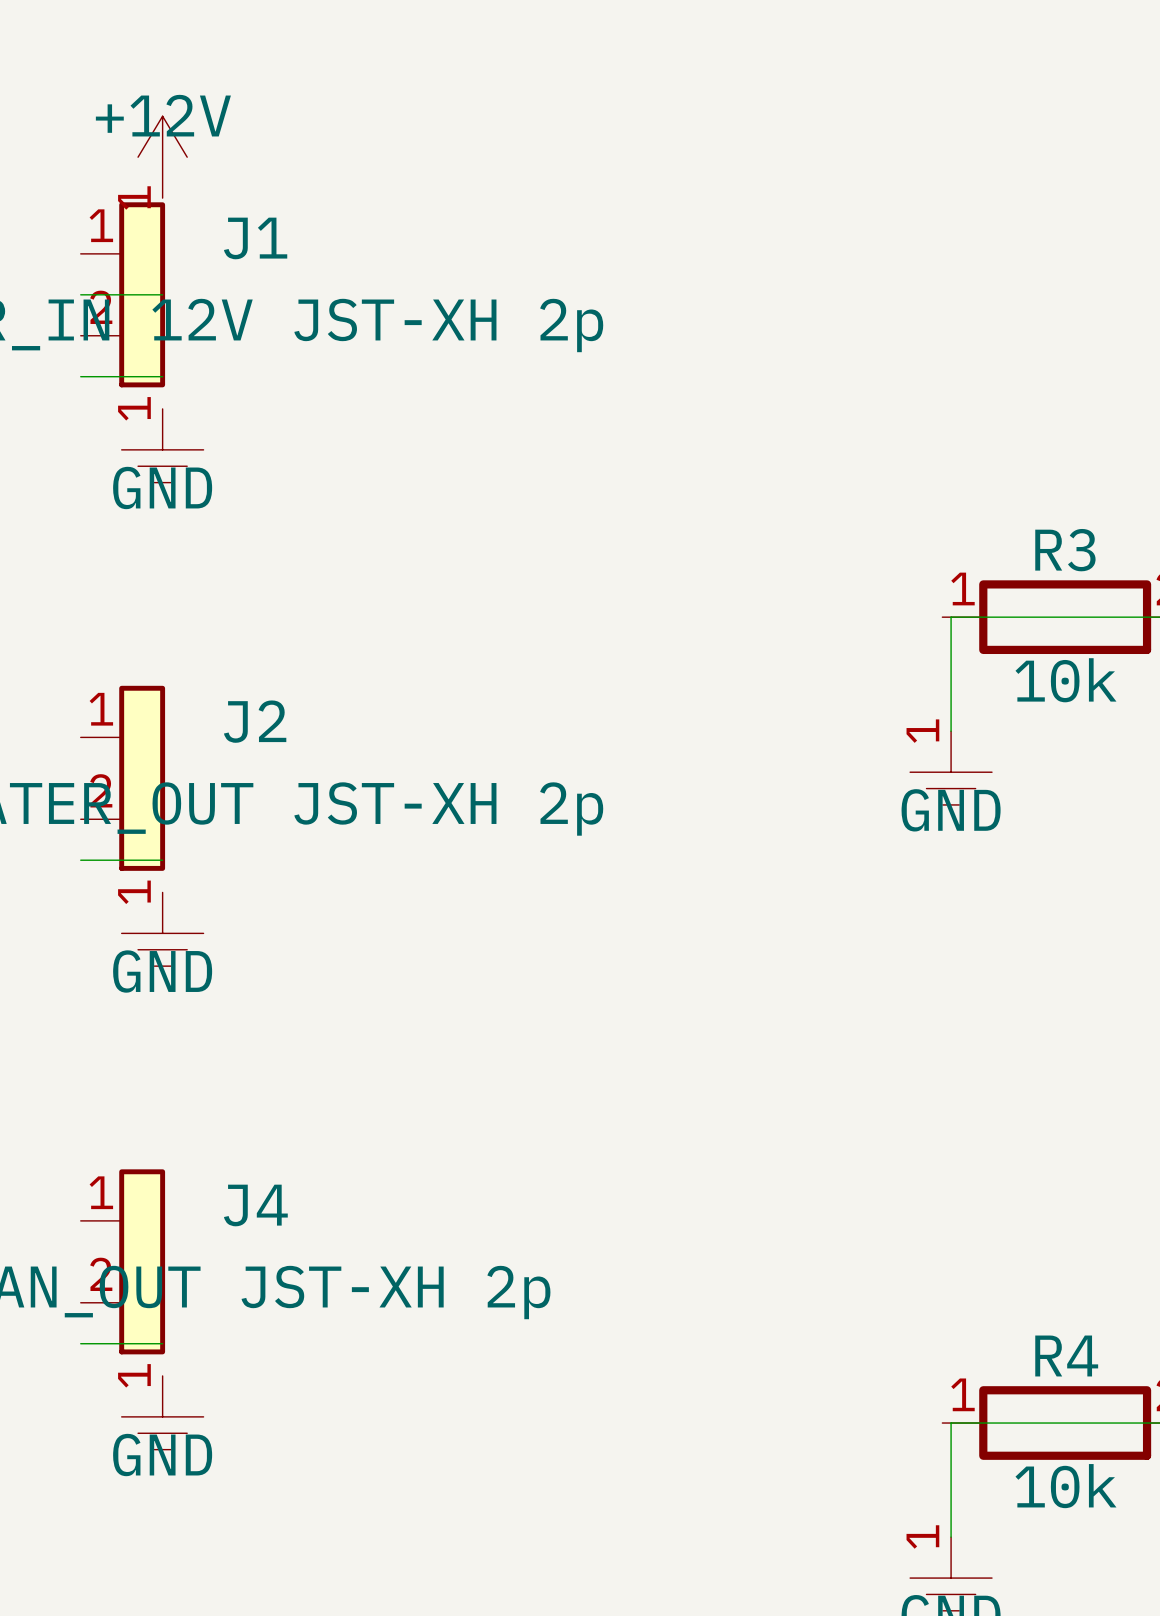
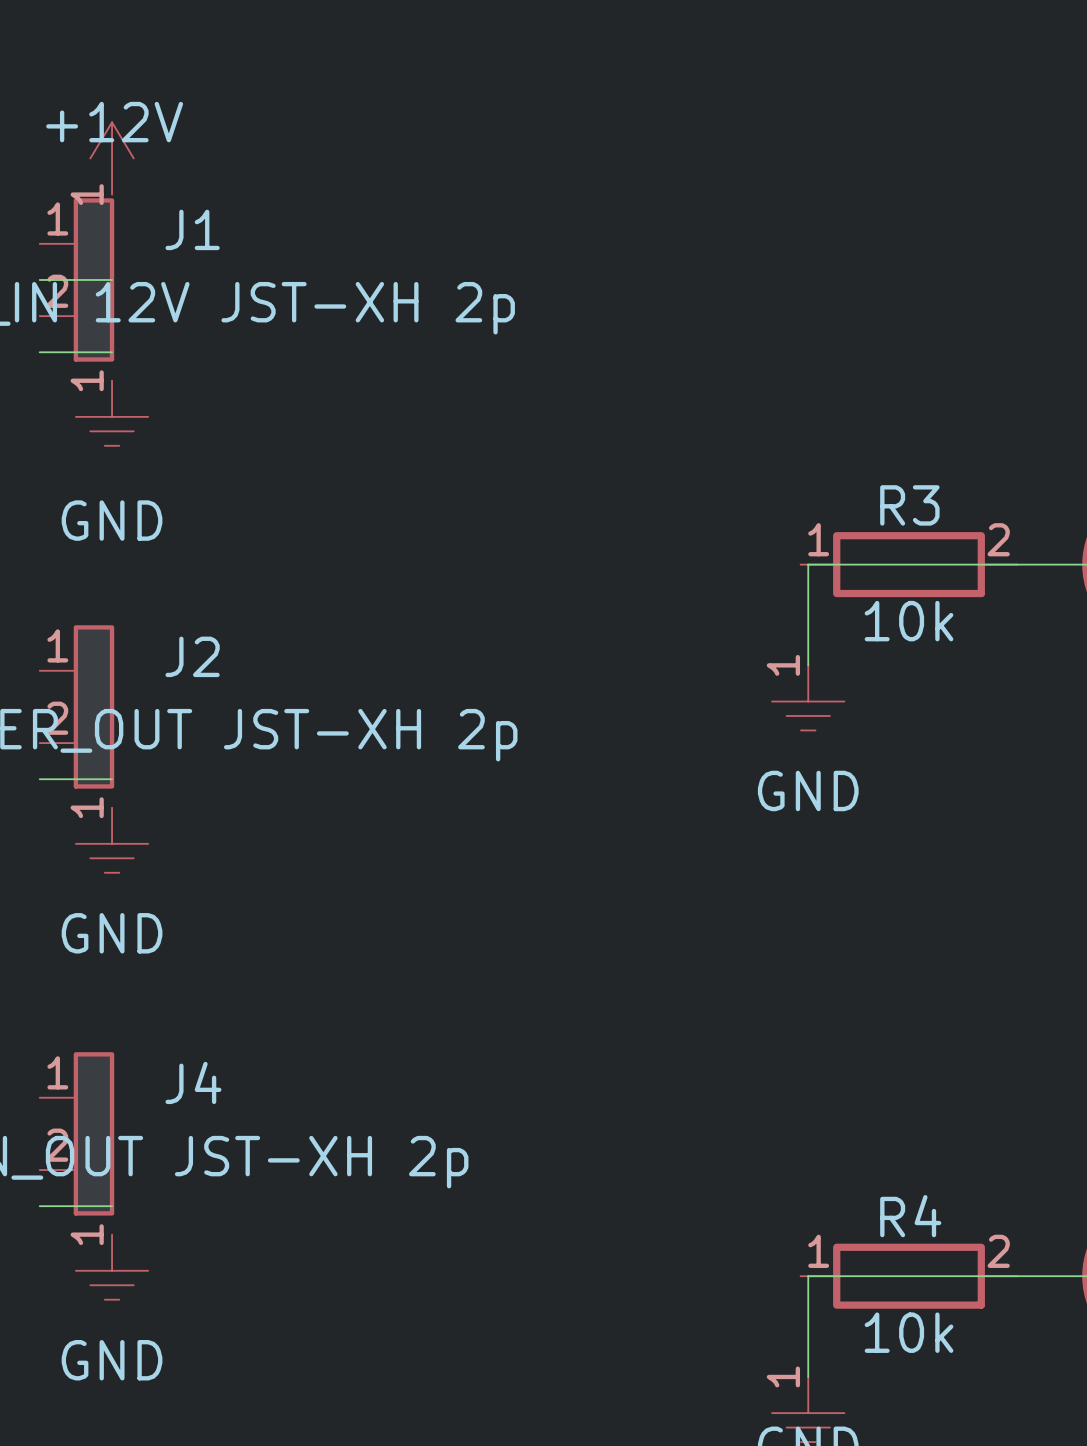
power symbol text position: GND (162, 487) -> GND (112, 520)
power symbol text position: GND (951, 810) -> GND (808, 790)
power symbol text position: GND (162, 971) -> GND (112, 933)
power symbol text position: GND (162, 1455) -> GND (112, 1360)

